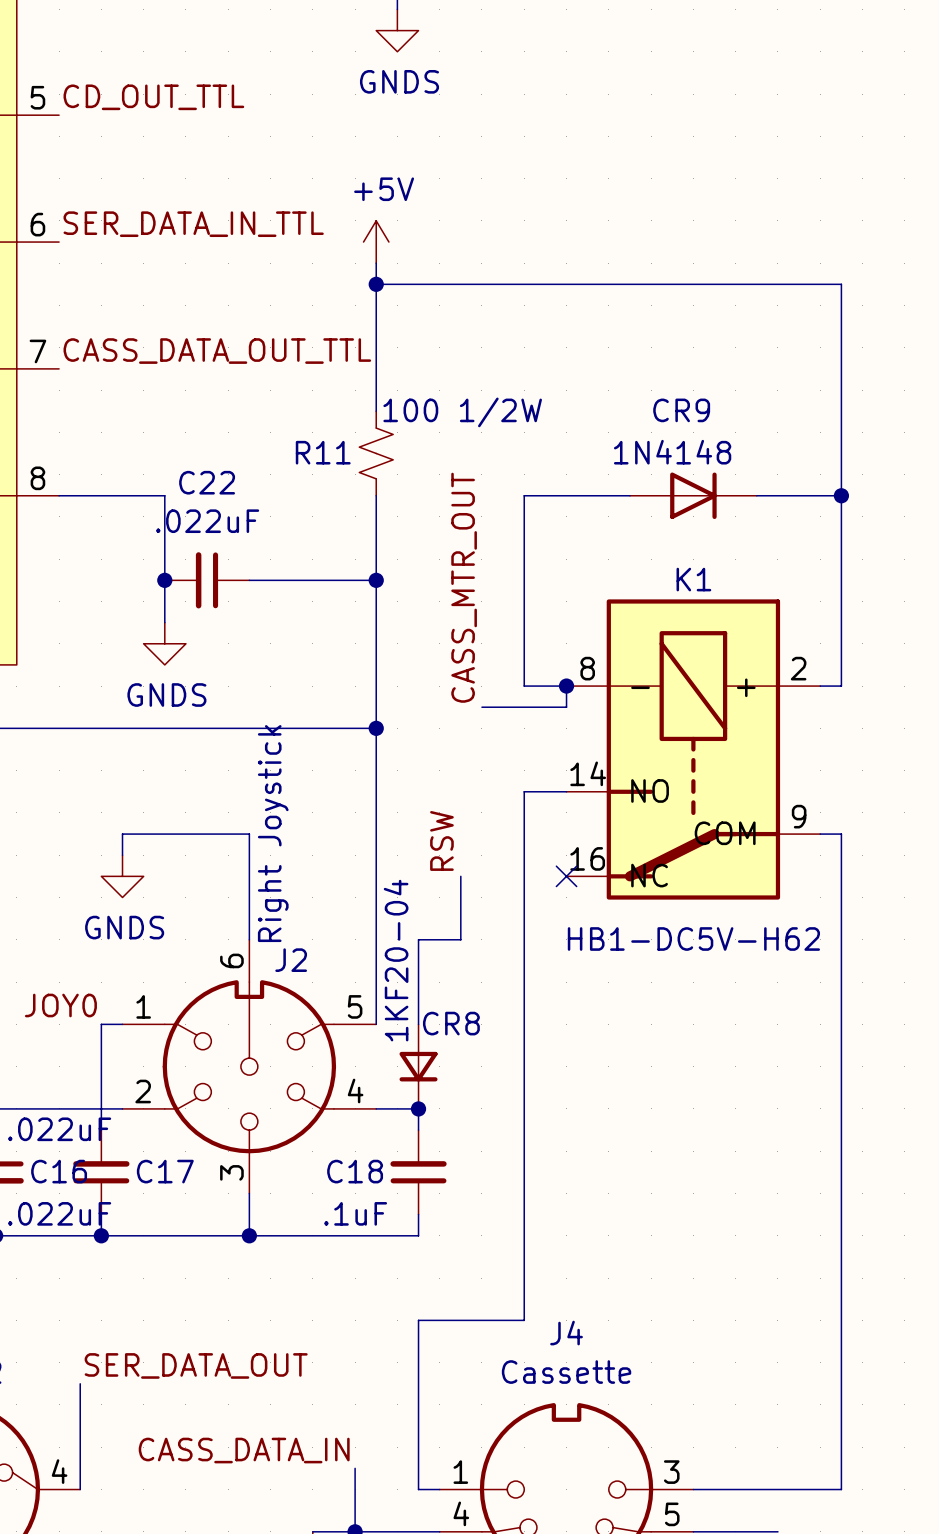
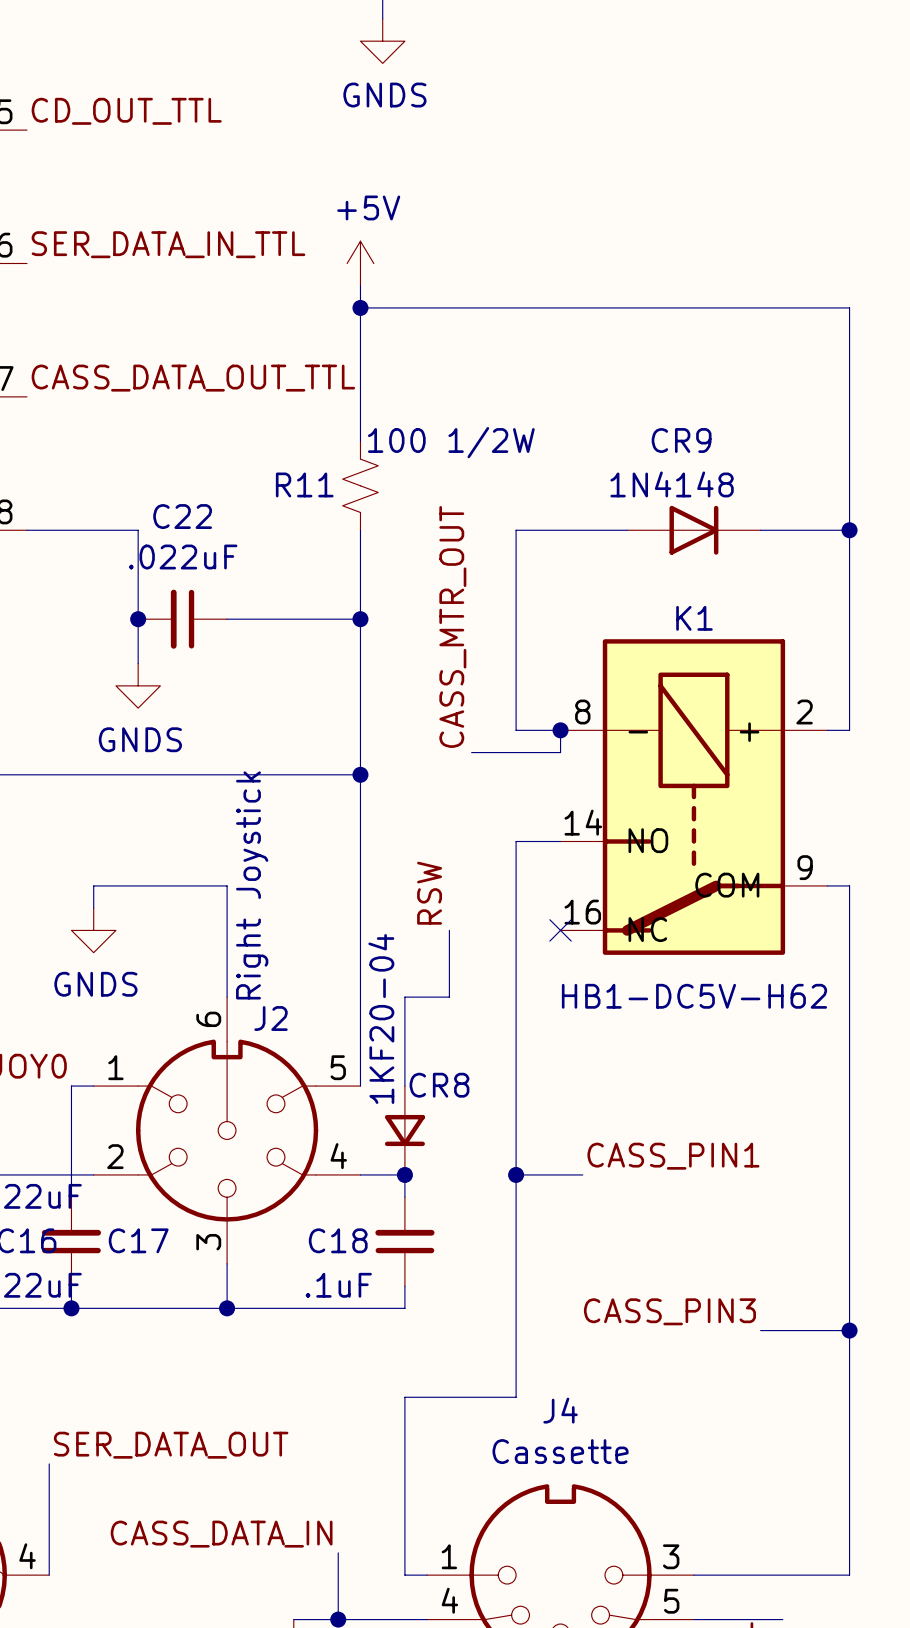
label: none -> CASS_PIN1 (673, 1156)
wire: none -> (516, 1174) (582, 1174)
junction: none -> (516, 1174)
label: none -> CASS_PIN3 (669, 1311)
wire: none -> (760, 1330) (849, 1330)
junction: none -> (849, 1330)

